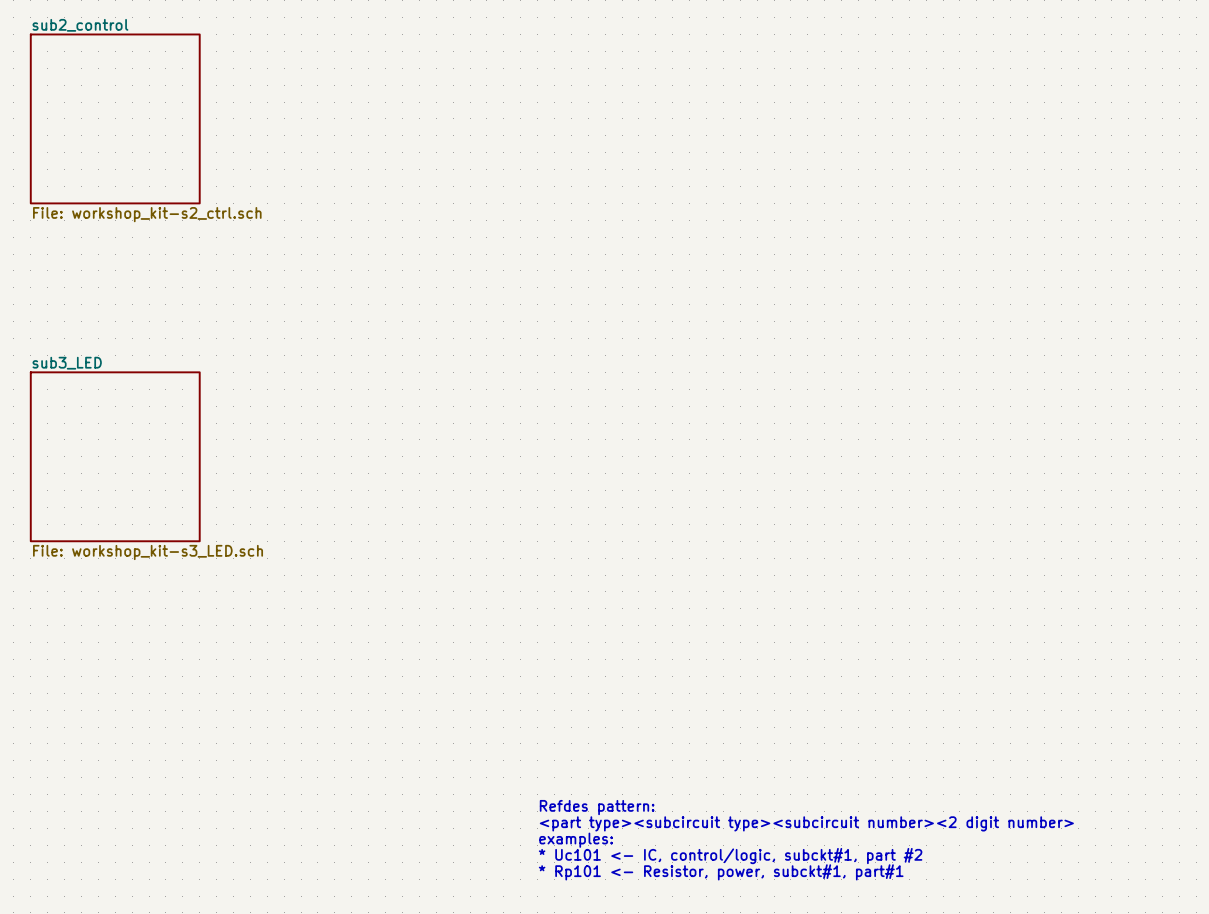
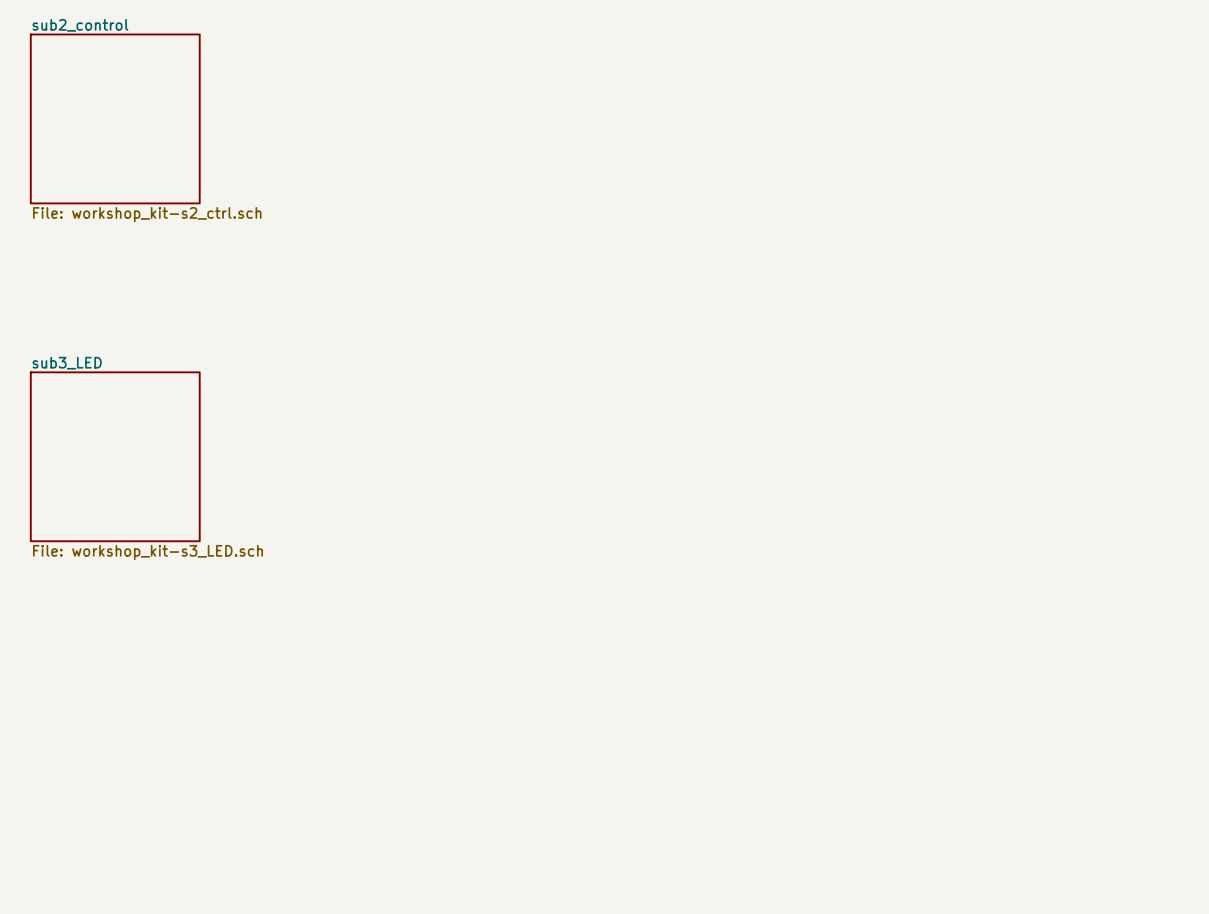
text: Refdes pattern: (597, 807) -> none
text: <part type><subcircuit type><subcircuit number><2 digit number> (806, 823) -> none
text: examples: (576, 840) -> none
text: * Uc101 <- IC, control/logic, subckt#1, part #2 (730, 856) -> none
text: * Rp101 <- Resistor, power, subckt#1, part#1 (721, 872) -> none

